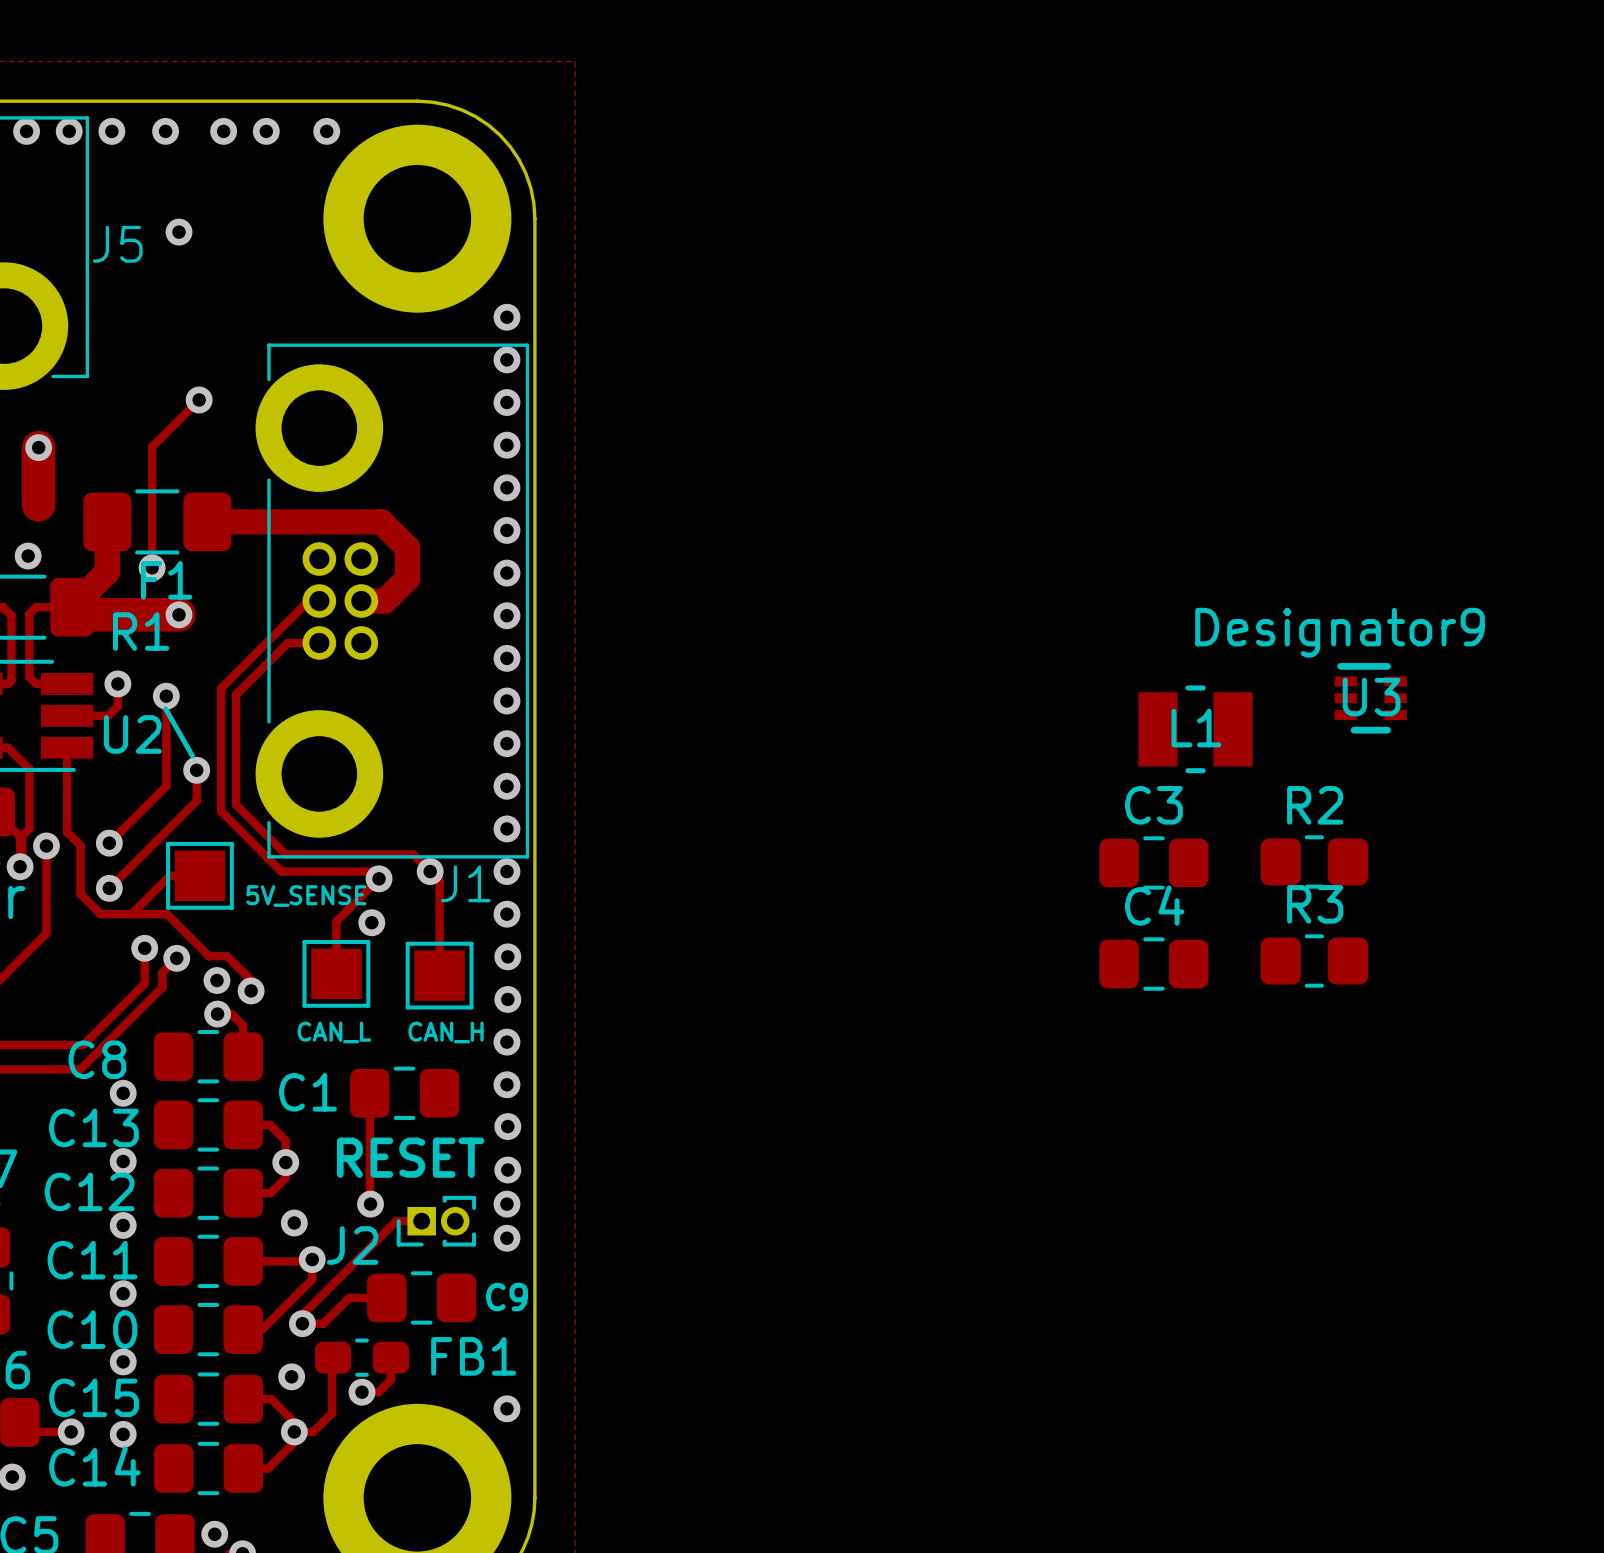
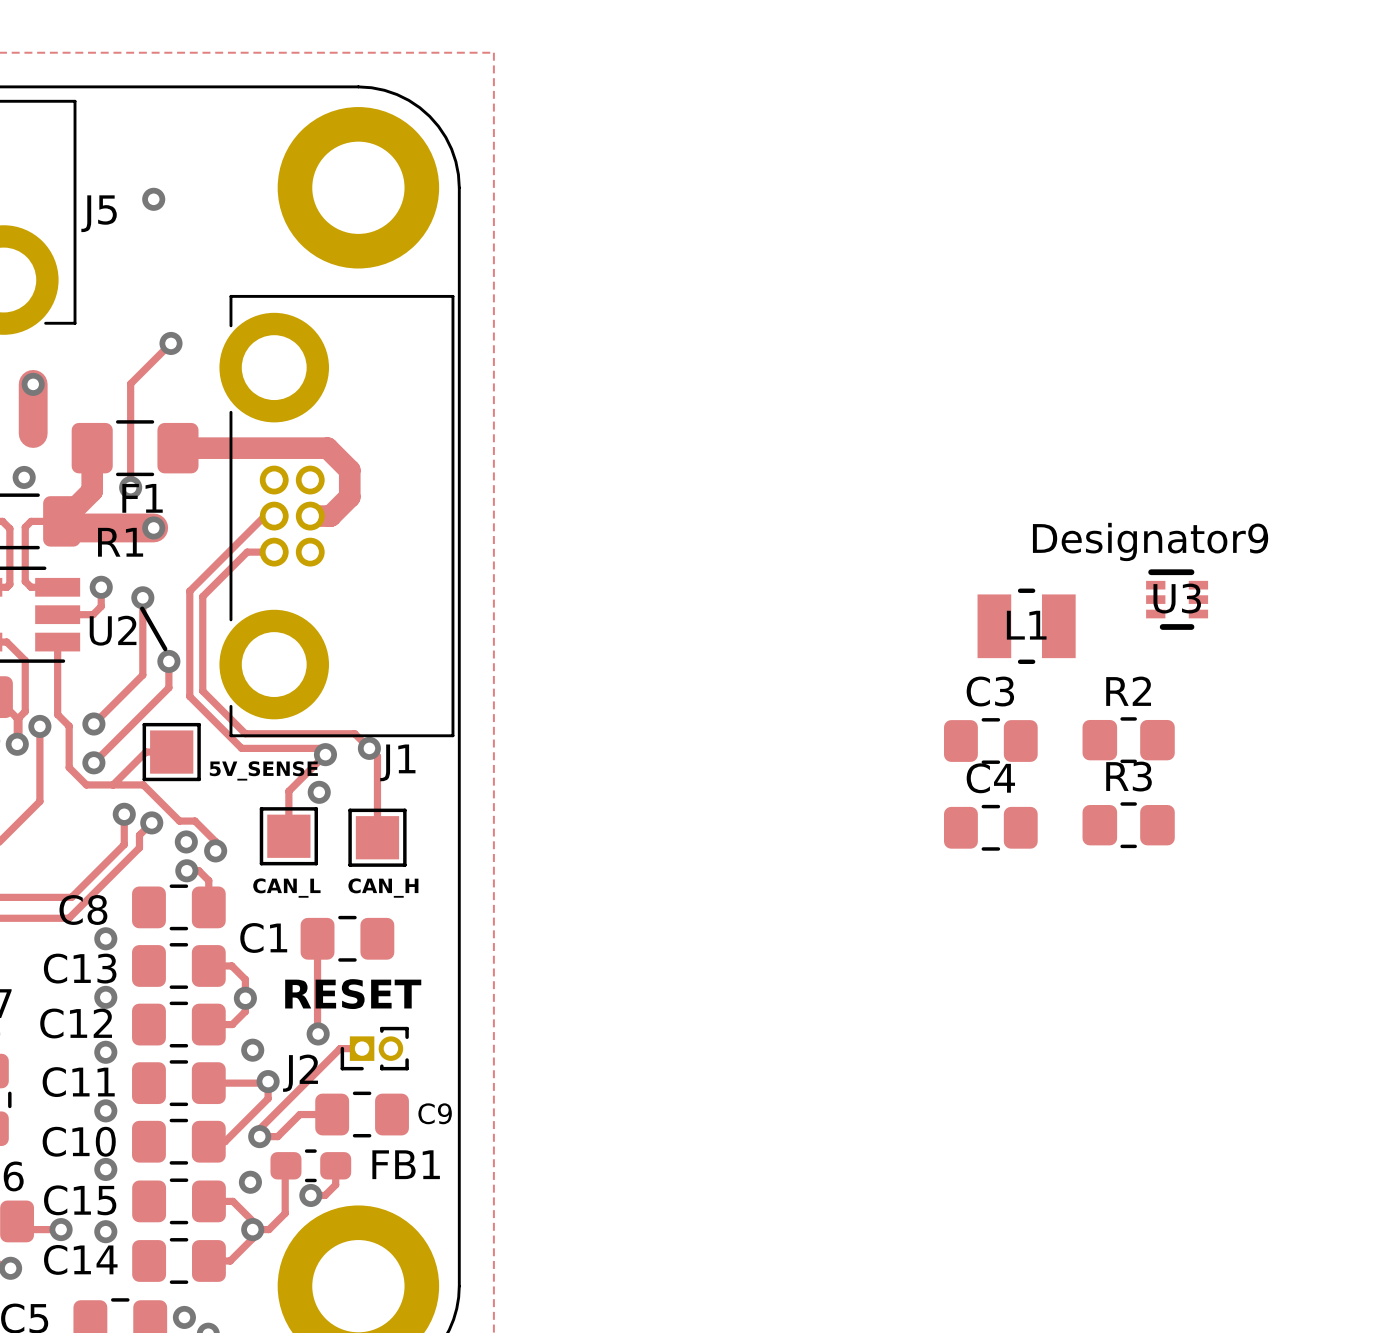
via: (26, 131) -> none
via: (69, 131) -> none
via: (111, 131) -> none
via: (165, 131) -> none
via: (223, 131) -> none
via: (266, 131) -> none
via: (326, 131) -> none
via: (506, 317) -> none
via: (506, 359) -> none
via: (506, 402) -> none
via: (506, 445) -> none
via: (506, 487) -> none
via: (506, 530) -> none
via: (506, 573) -> none
via: (506, 615) -> none
via: (506, 658) -> none
via: (506, 701) -> none
via: (506, 743) -> none
via: (506, 786) -> none
via: (506, 828) -> none
via: (506, 871) -> none
via: (506, 914) -> none
via: (507, 956) -> none
via: (507, 999) -> none
via: (506, 1042) -> none
via: (506, 1084) -> none
via: (507, 1126) -> none
via: (507, 1170) -> none
via: (506, 1204) -> none
via: (506, 1238) -> none
via: (506, 1408) -> none

